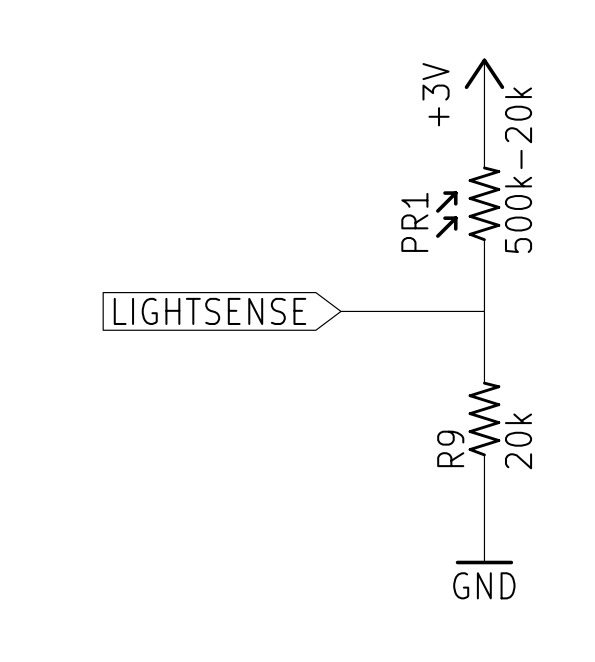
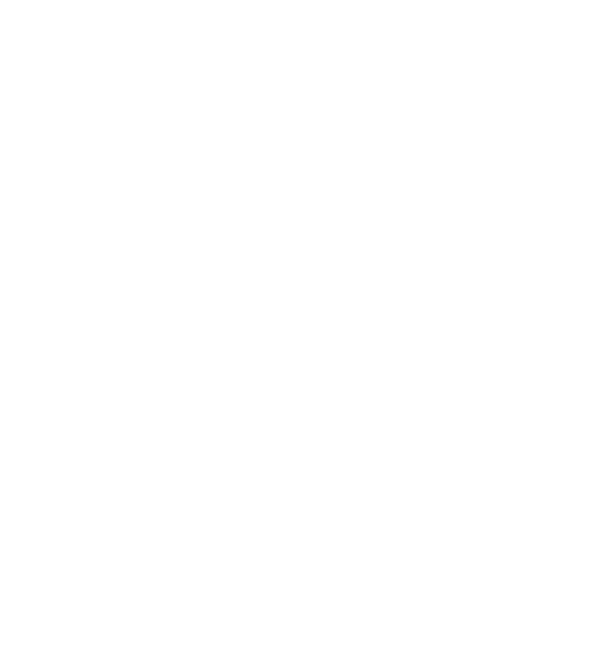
power symbol: +3V (484, 77) -> none
wire: (484, 96) (484, 132) -> none
PR1: 500k-20k (468, 203) -> none
wire: (484, 275) (484, 347) -> none
global label: LIGHTSENSE (209, 311) -> none
wire: (340, 311) (484, 311) -> none
R9: 20k (484, 419) -> none
wire: (484, 490) (484, 526) -> none
power symbol: GND (484, 545) -> none

